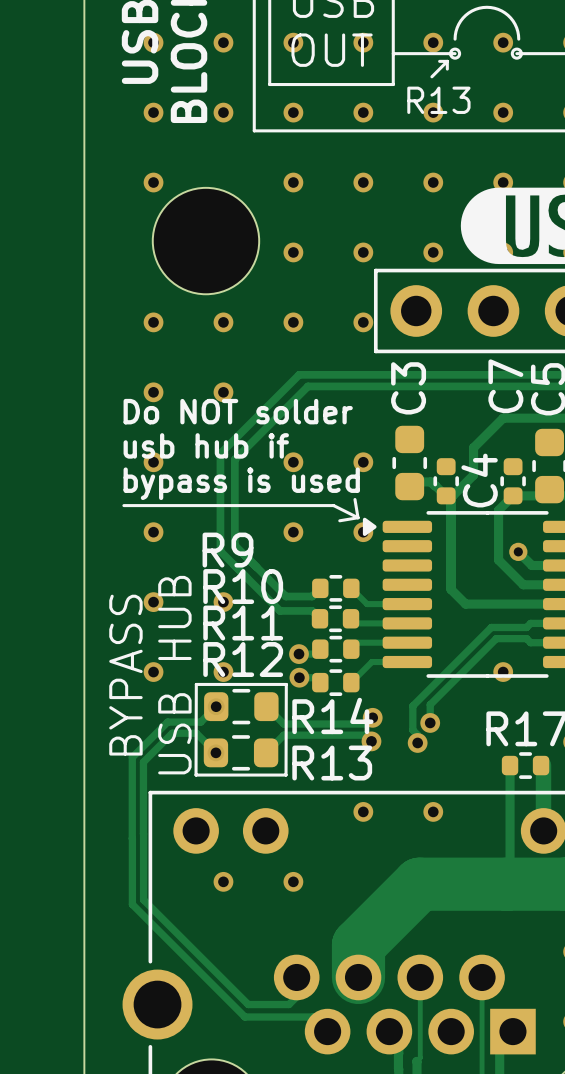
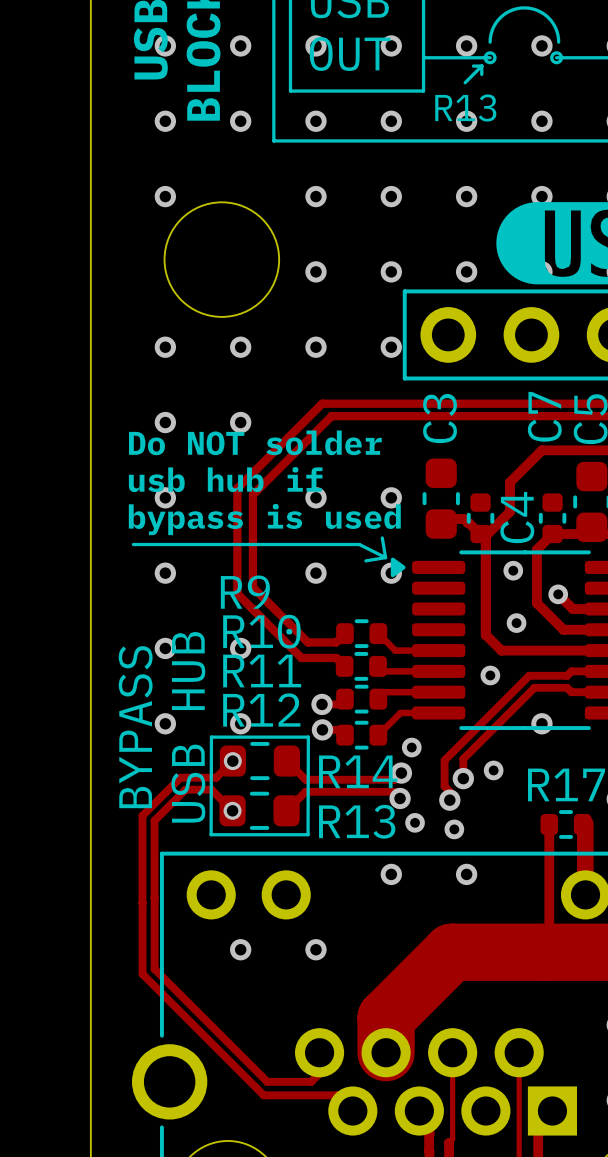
via: none -> (513, 570)
via: none -> (516, 623)
via: none -> (490, 675)
via: none -> (411, 747)
via: none -> (493, 770)
via: none -> (415, 822)
via: none -> (454, 829)

